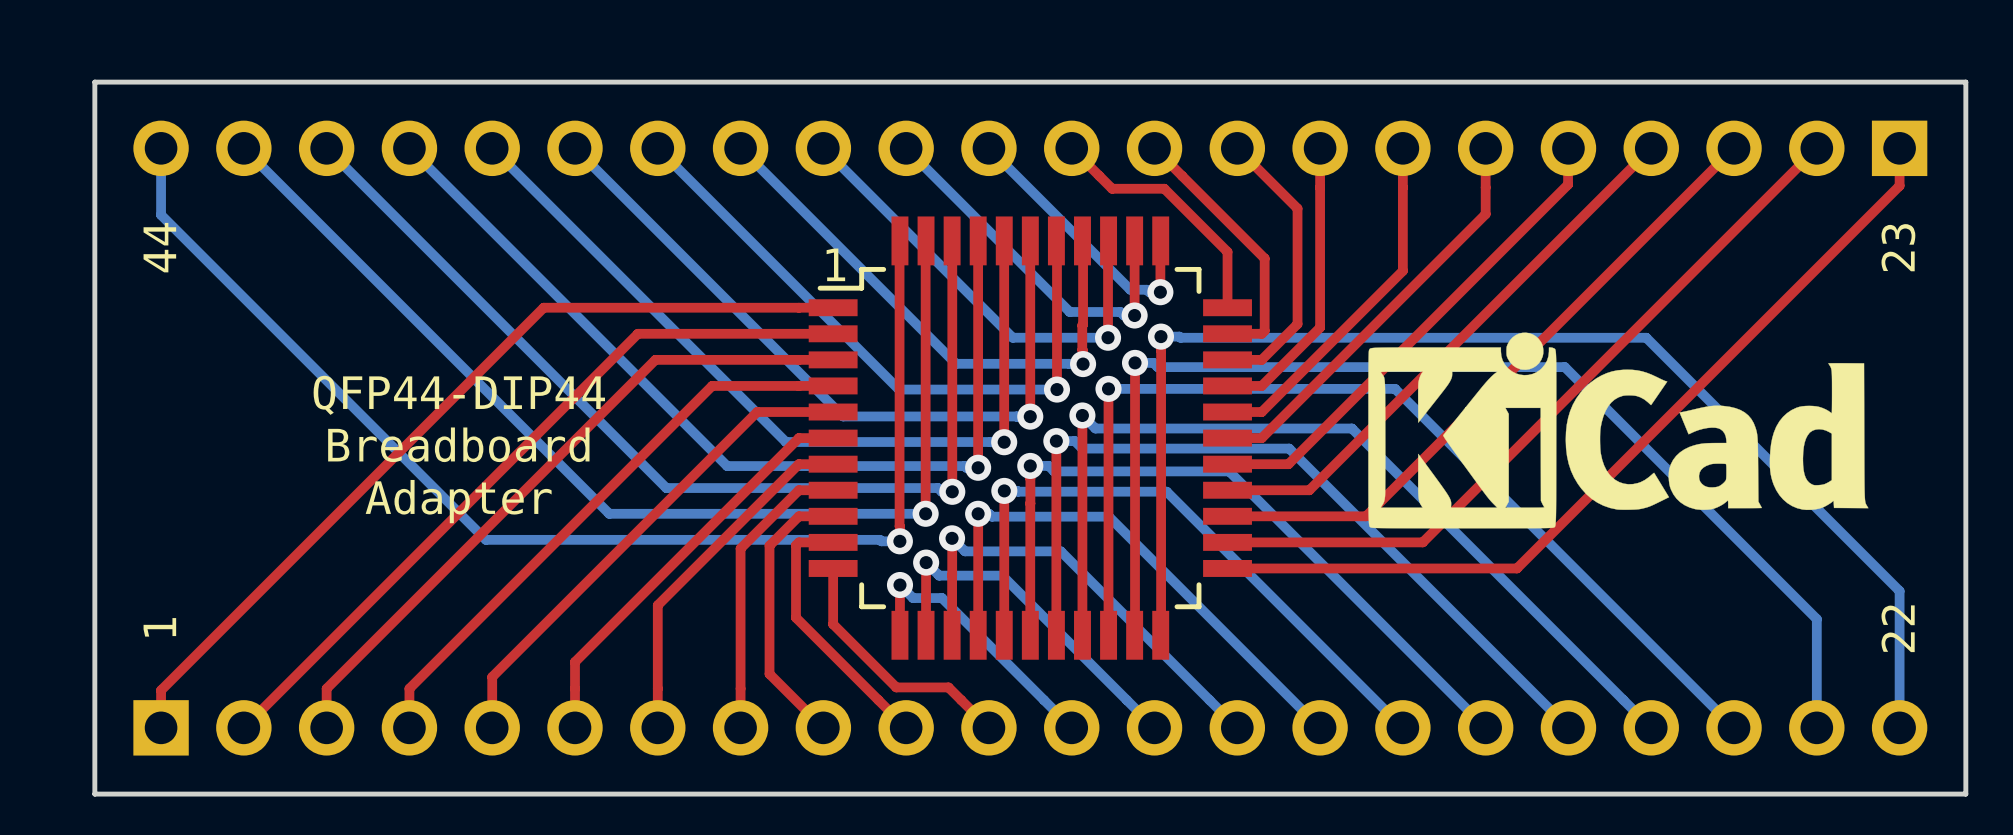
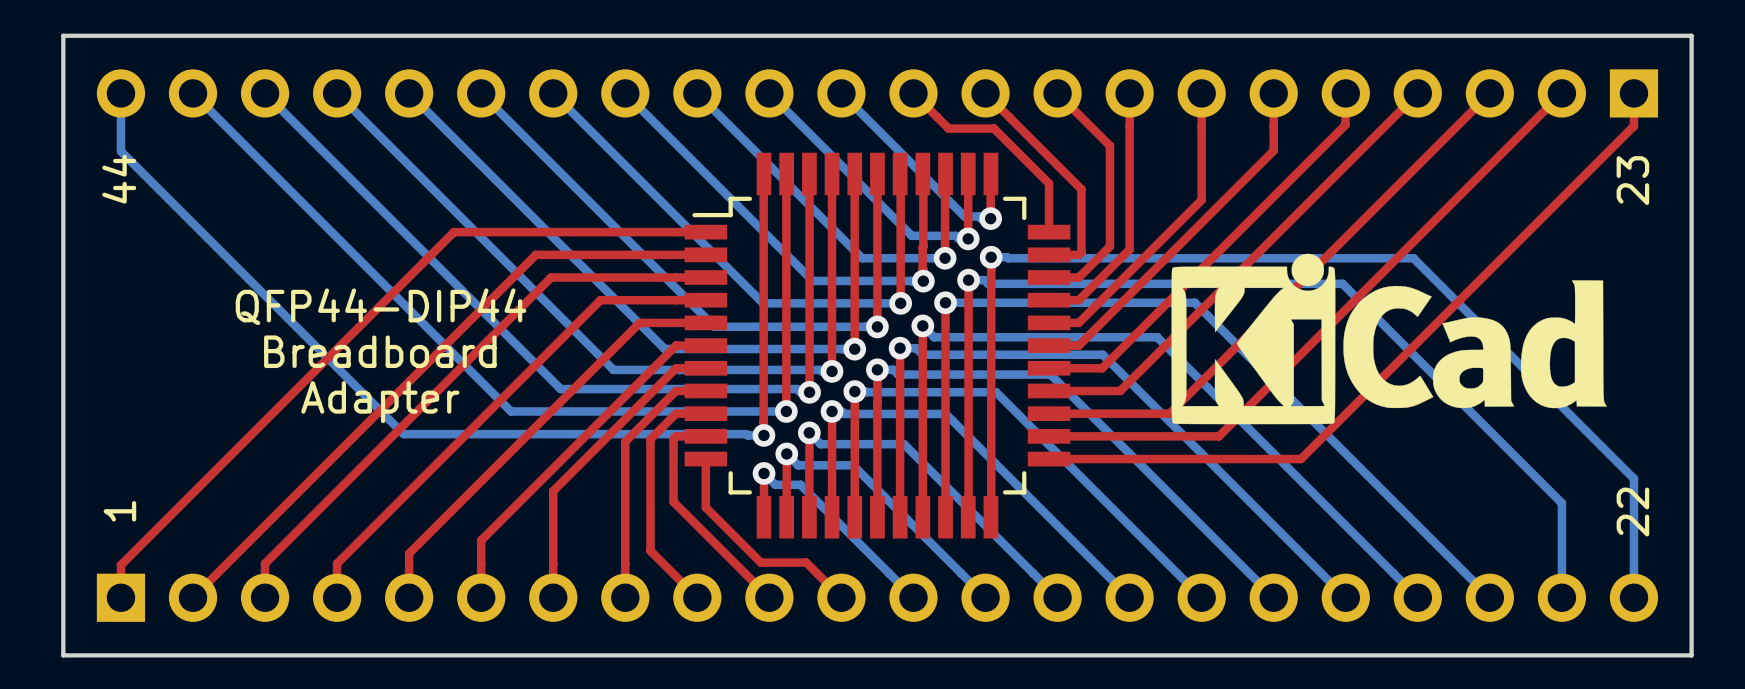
text: 1 (835, 264) -> none

